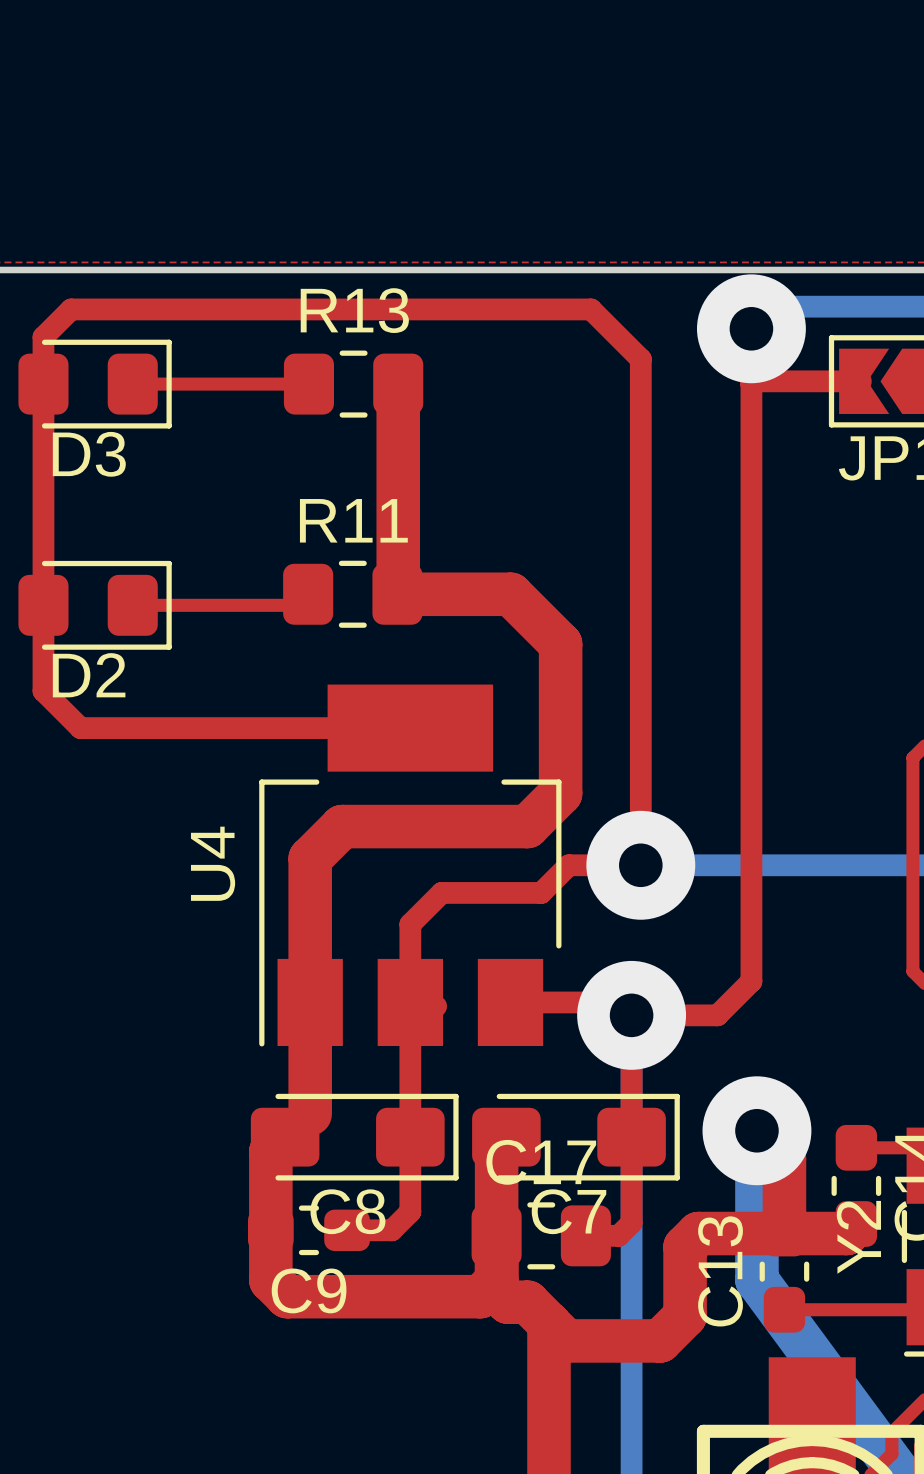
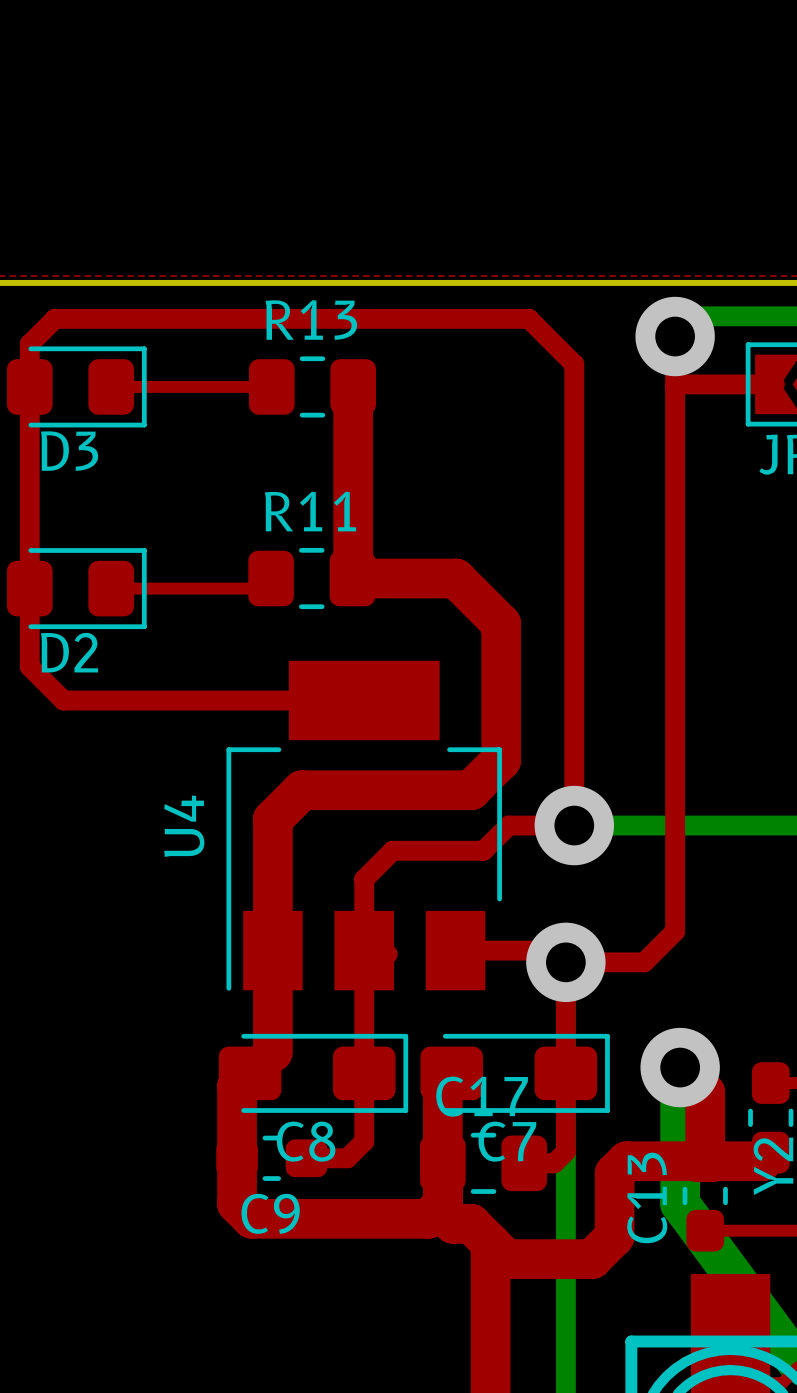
via size: [696, 274, 806, 384] -> [635, 296, 715, 377]
via size: [586, 810, 696, 920] -> [534, 785, 614, 866]
via size: [577, 960, 687, 1070] -> [526, 922, 606, 1003]
via size: [702, 1076, 812, 1186] -> [640, 1027, 720, 1108]

